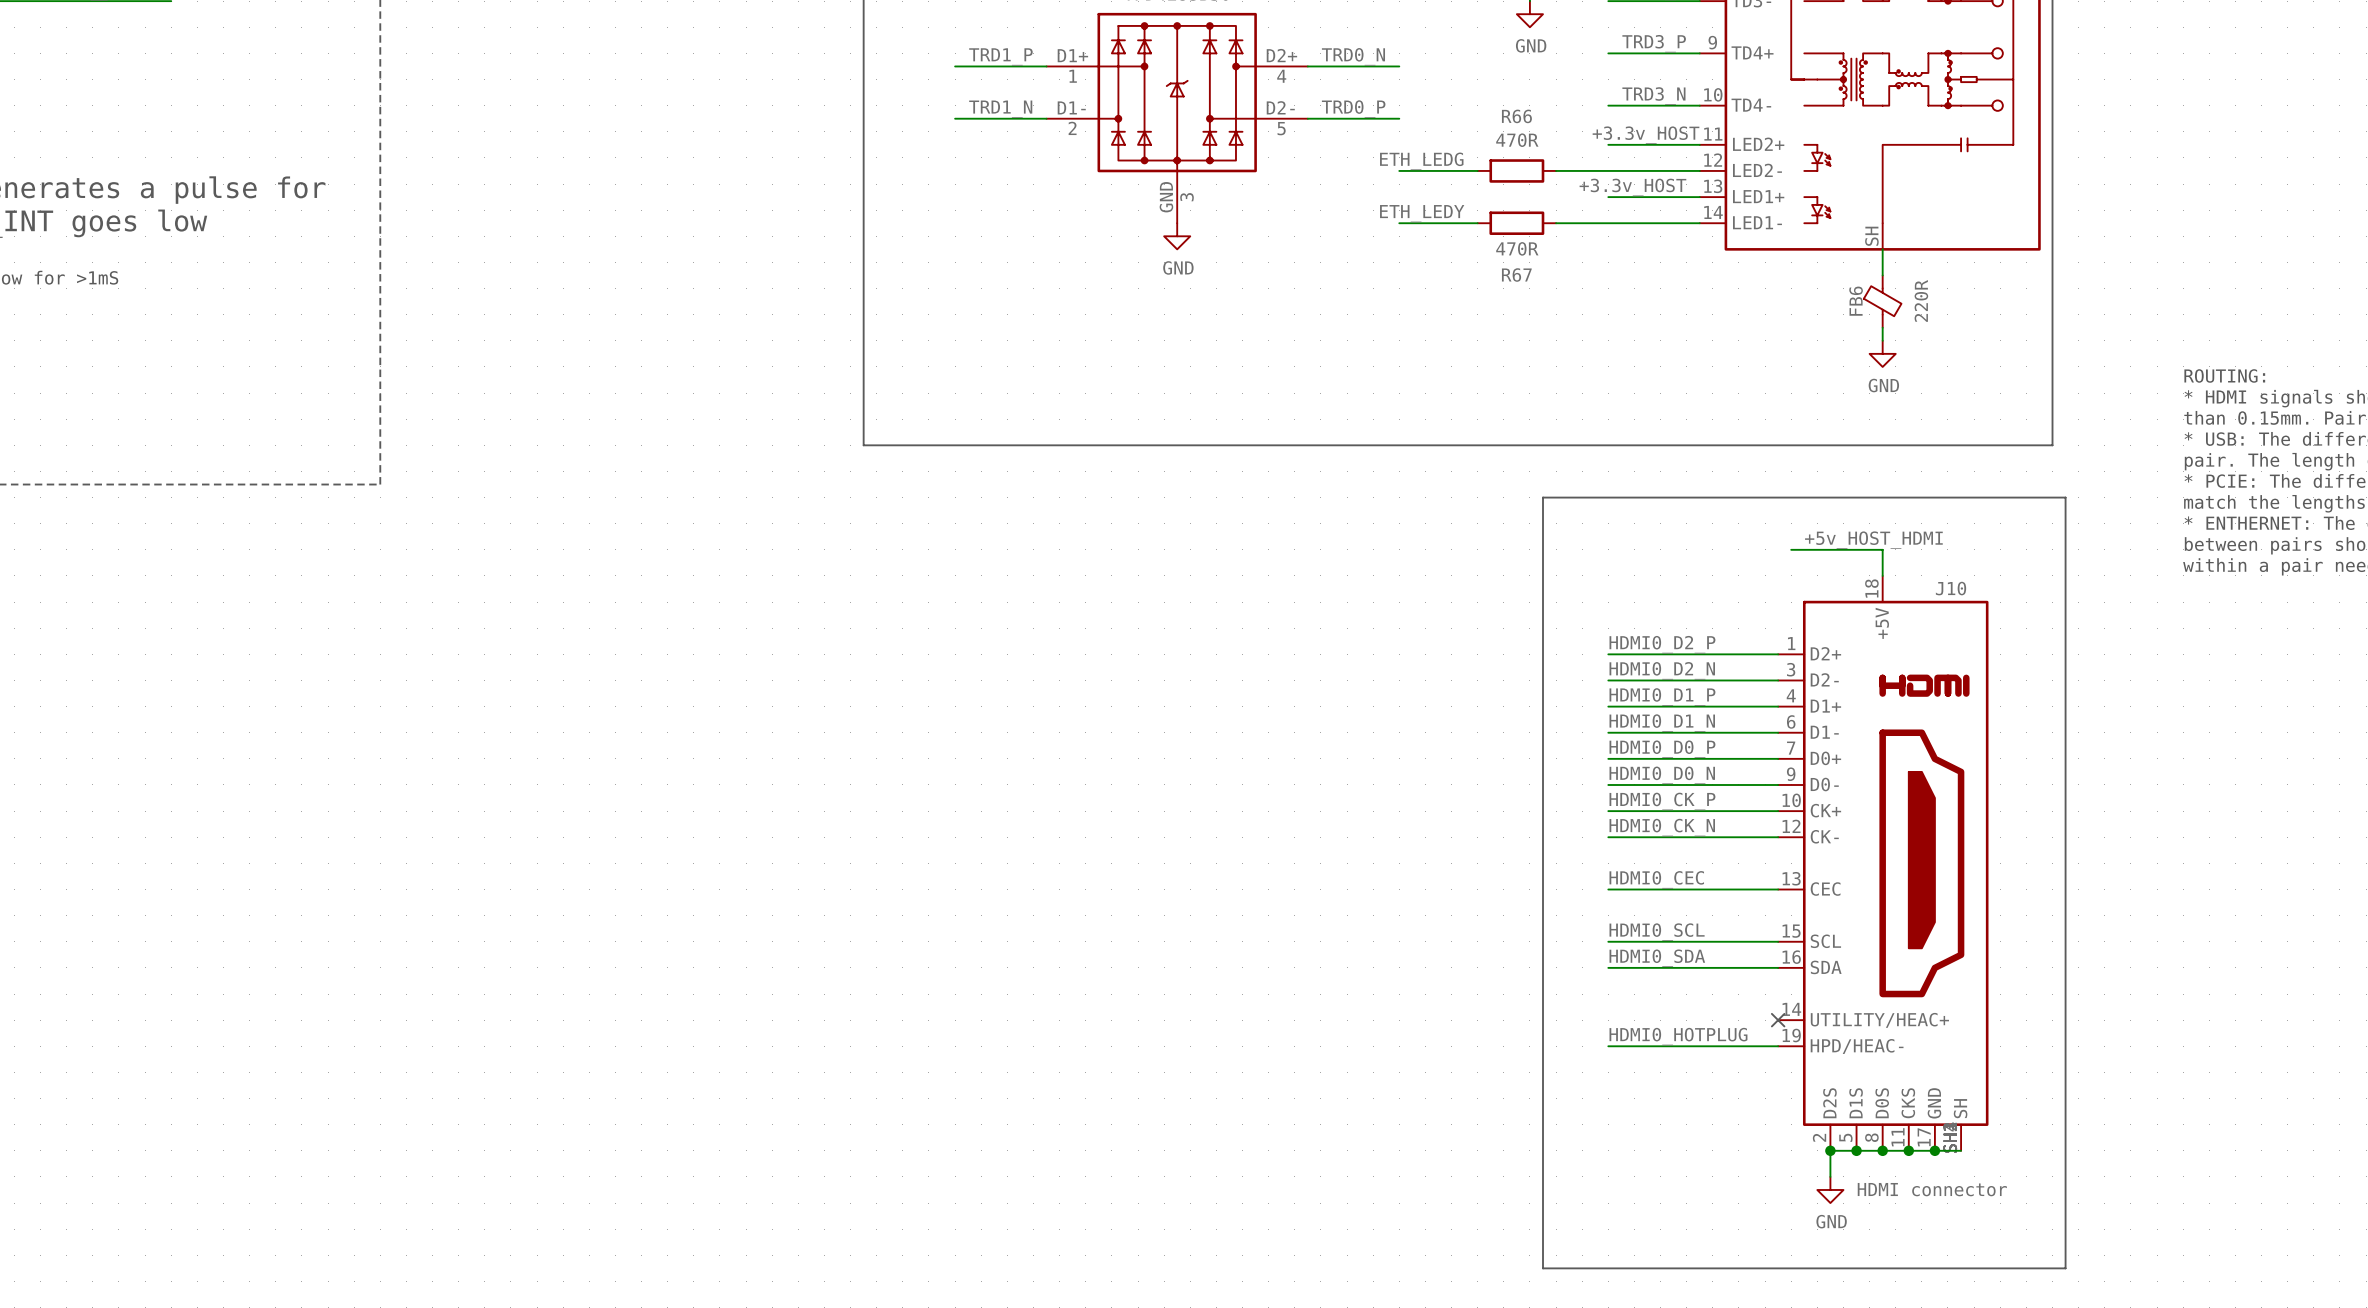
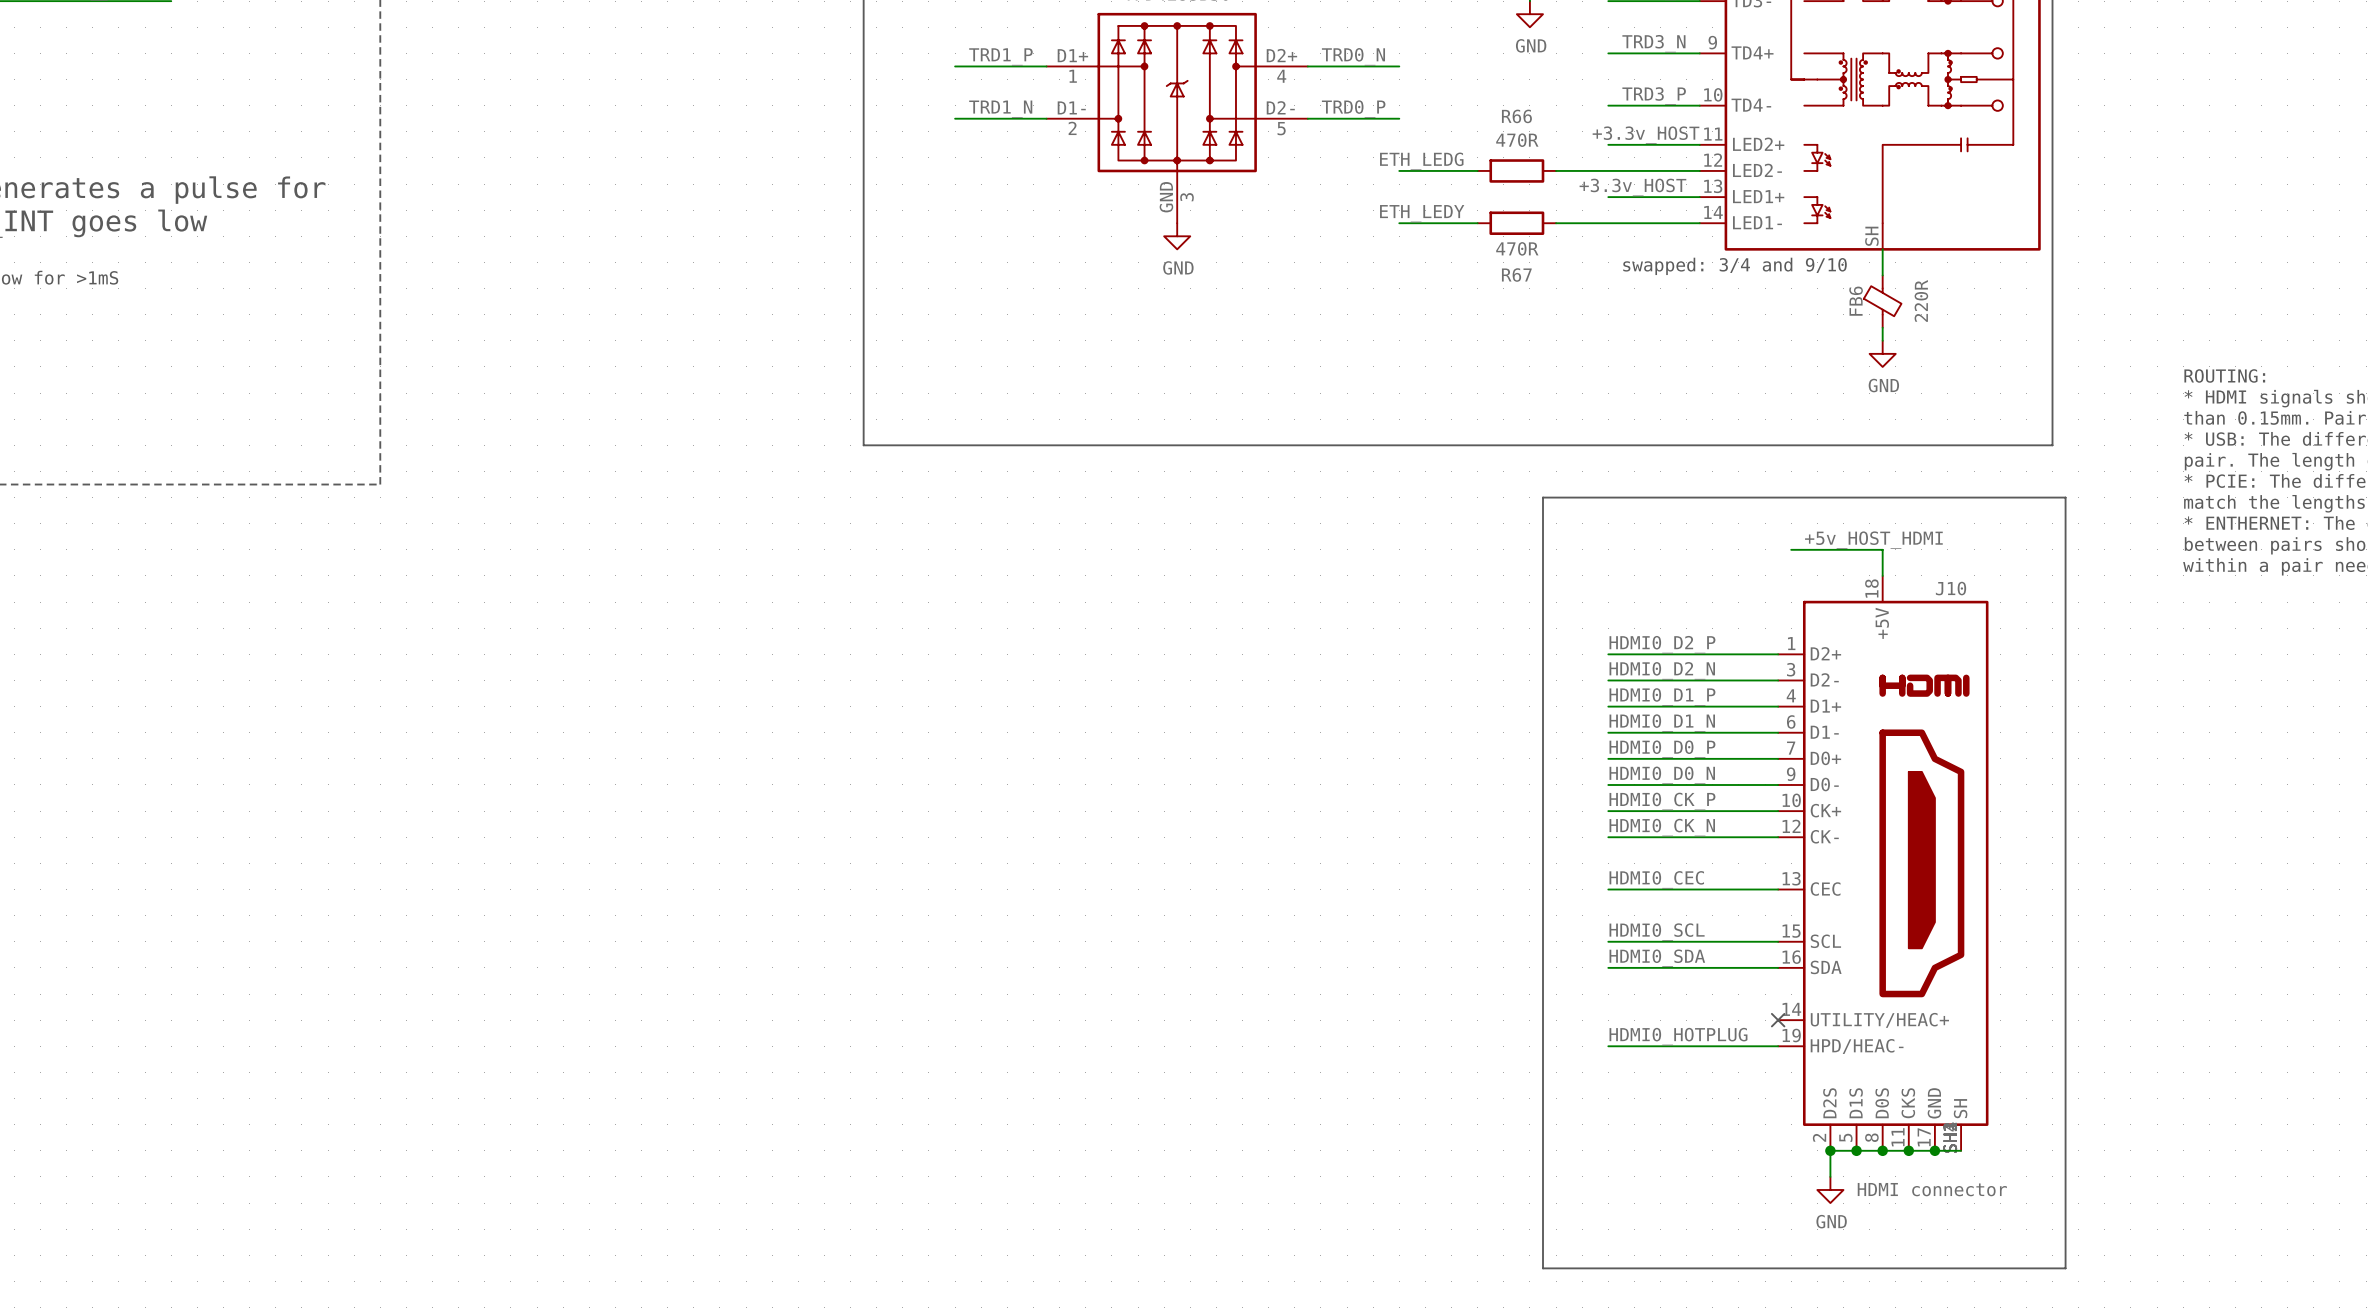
label: TRD3_P (1654, 43) -> TRD3_N (1653, 43)
label: TRD3_N (1653, 95) -> TRD3_P (1654, 95)
text: none -> swapped: 3/4 and 9/10 (1735, 266)

